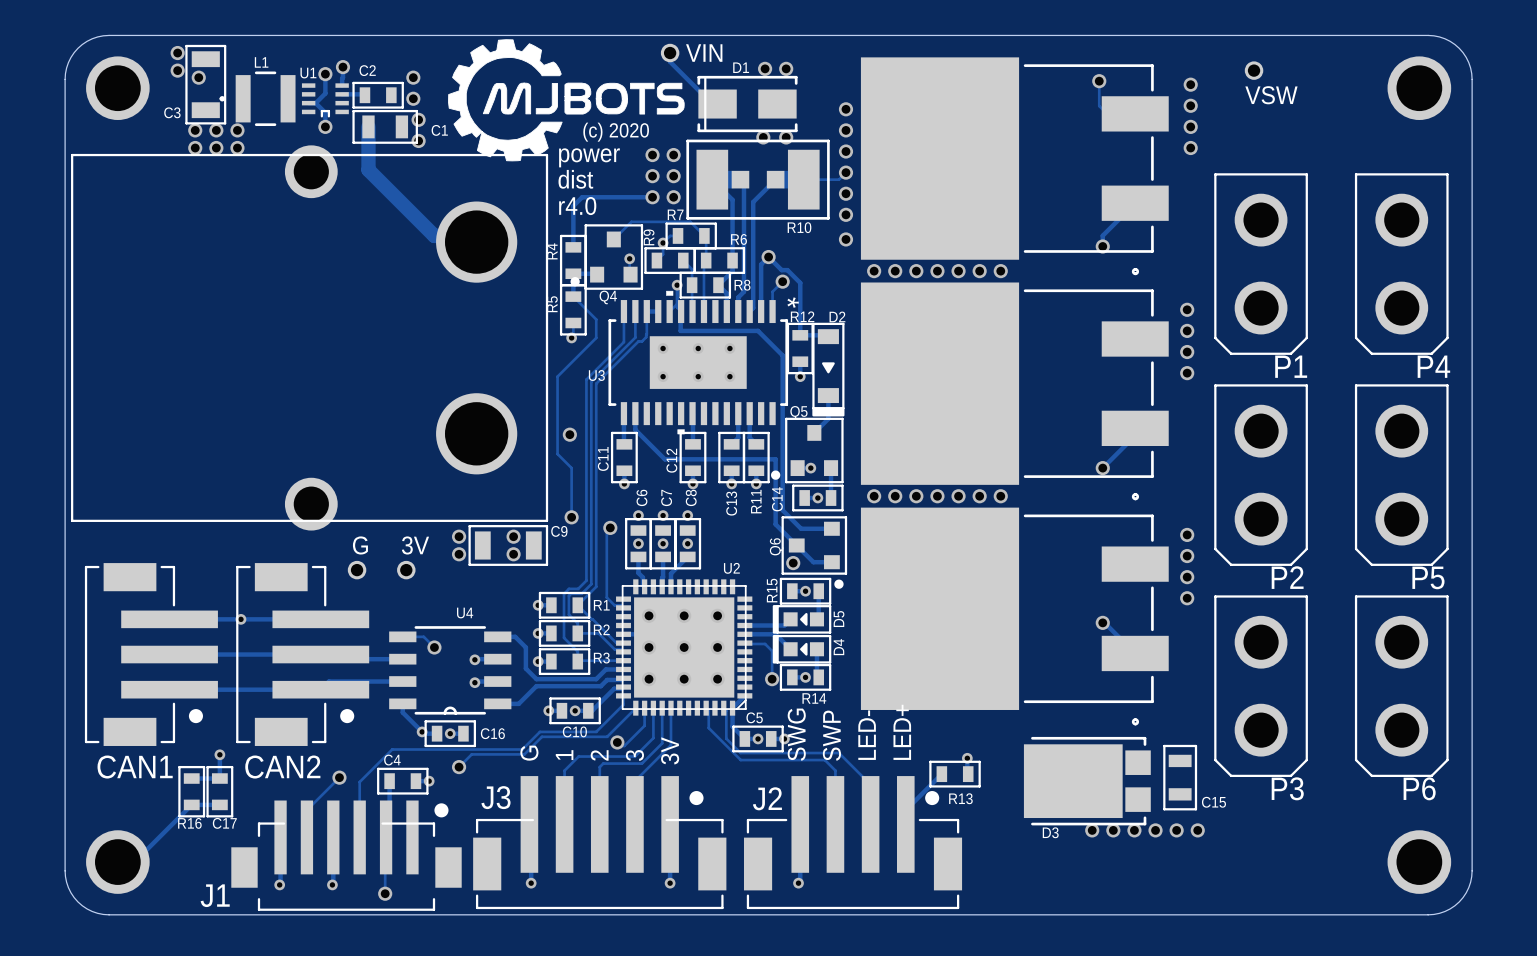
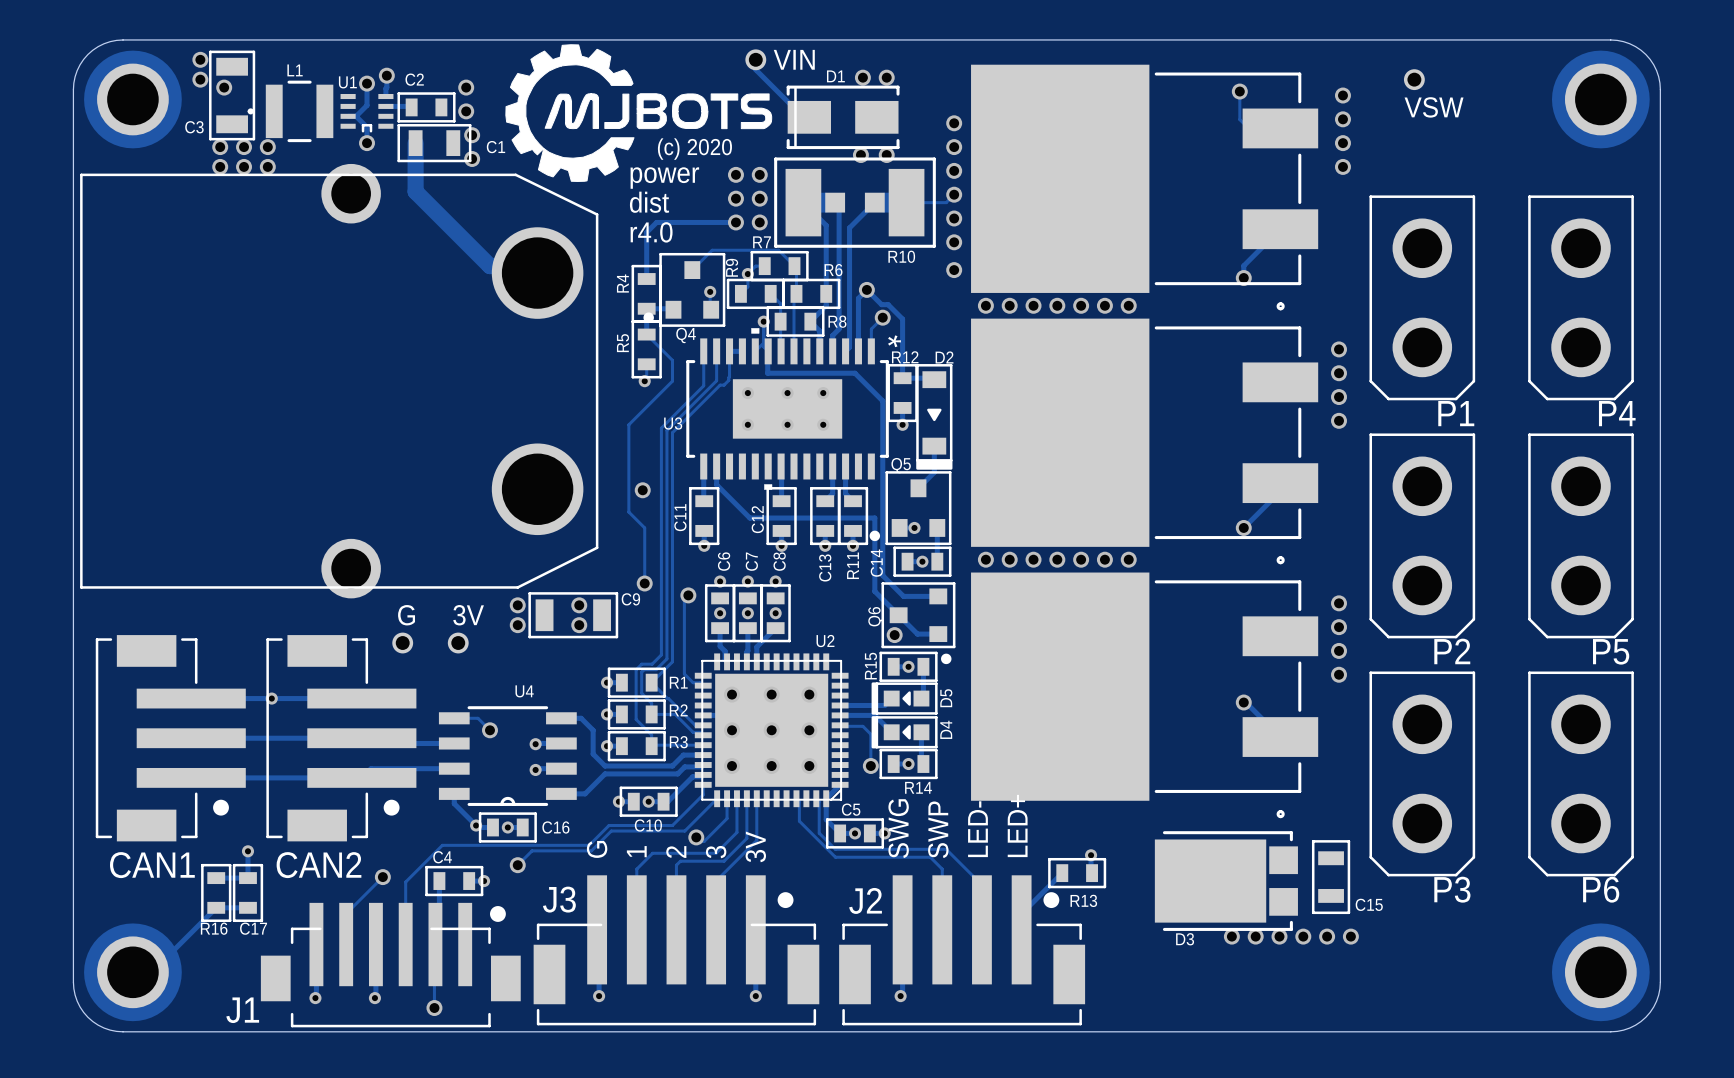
part footprint: [86, 56, 150, 121] -> [84, 50, 182, 149]
part footprint: [1387, 56, 1452, 121] -> [1551, 50, 1650, 149]
part footprint: [71, 145, 549, 531] -> [80, 163, 599, 599]
part footprint: [86, 830, 150, 894] -> [84, 923, 182, 1022]
part footprint: [1387, 830, 1452, 894] -> [1551, 923, 1650, 1022]

